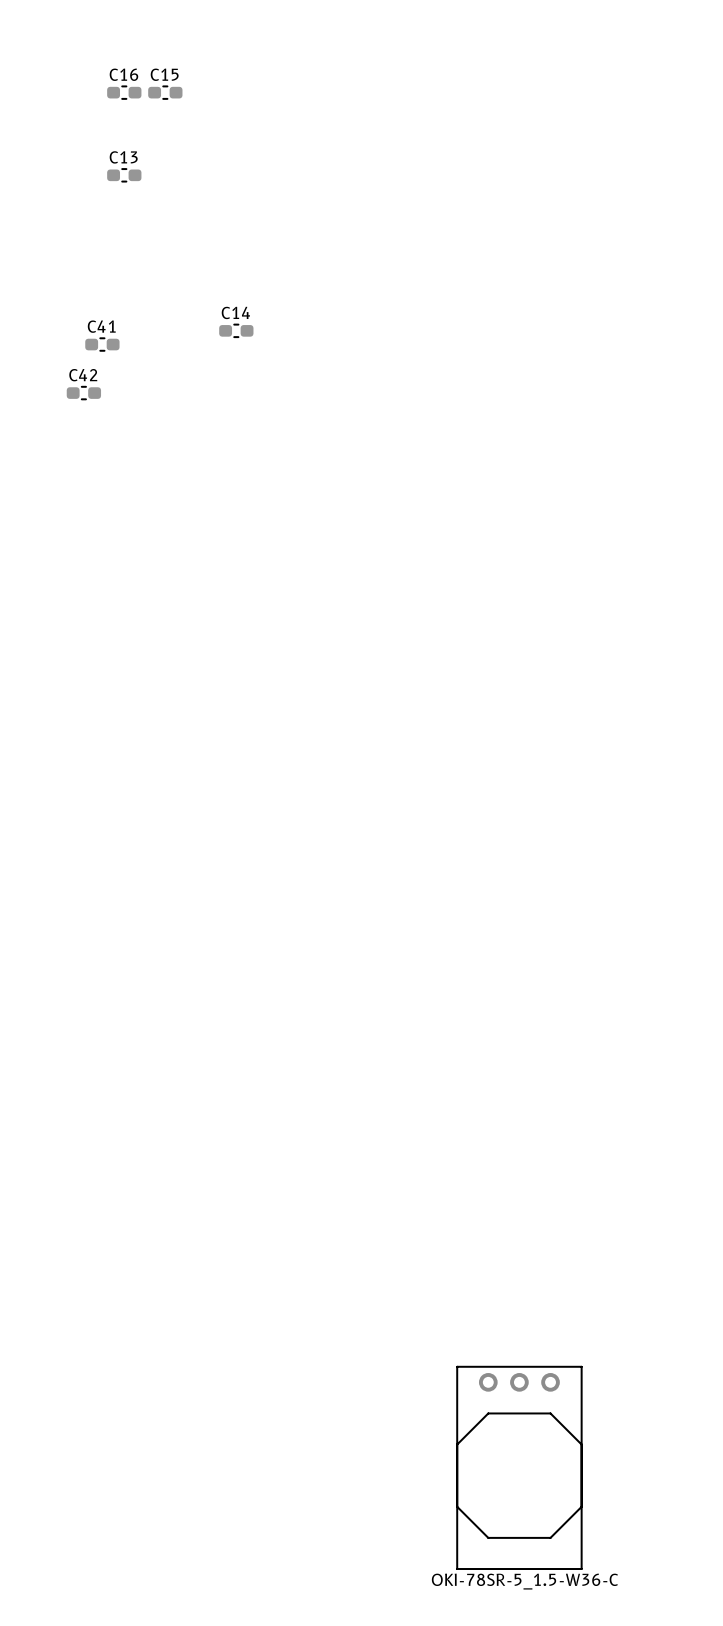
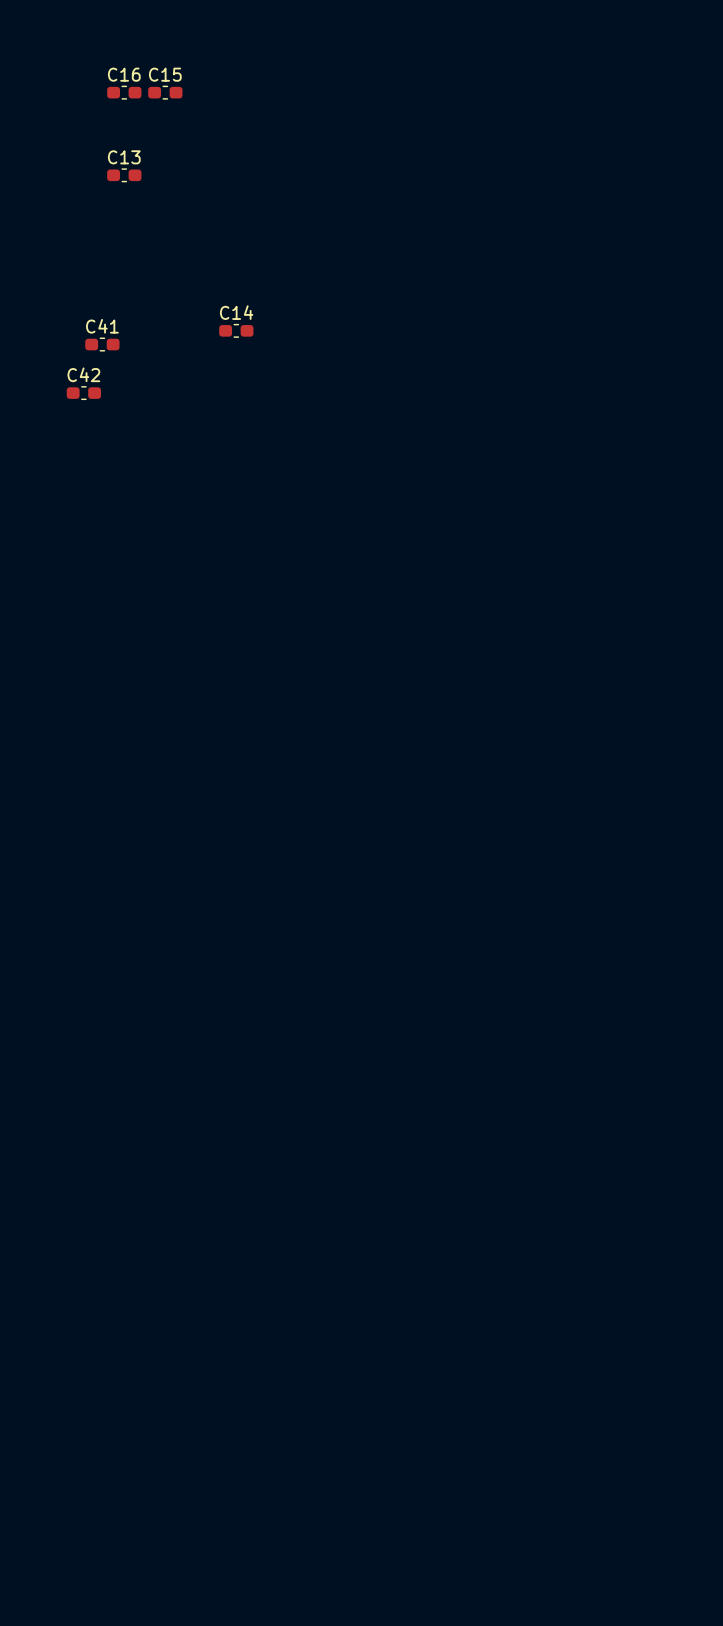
part: OKI-78SR-5_1.5-W36-C (519, 1467) -> none

